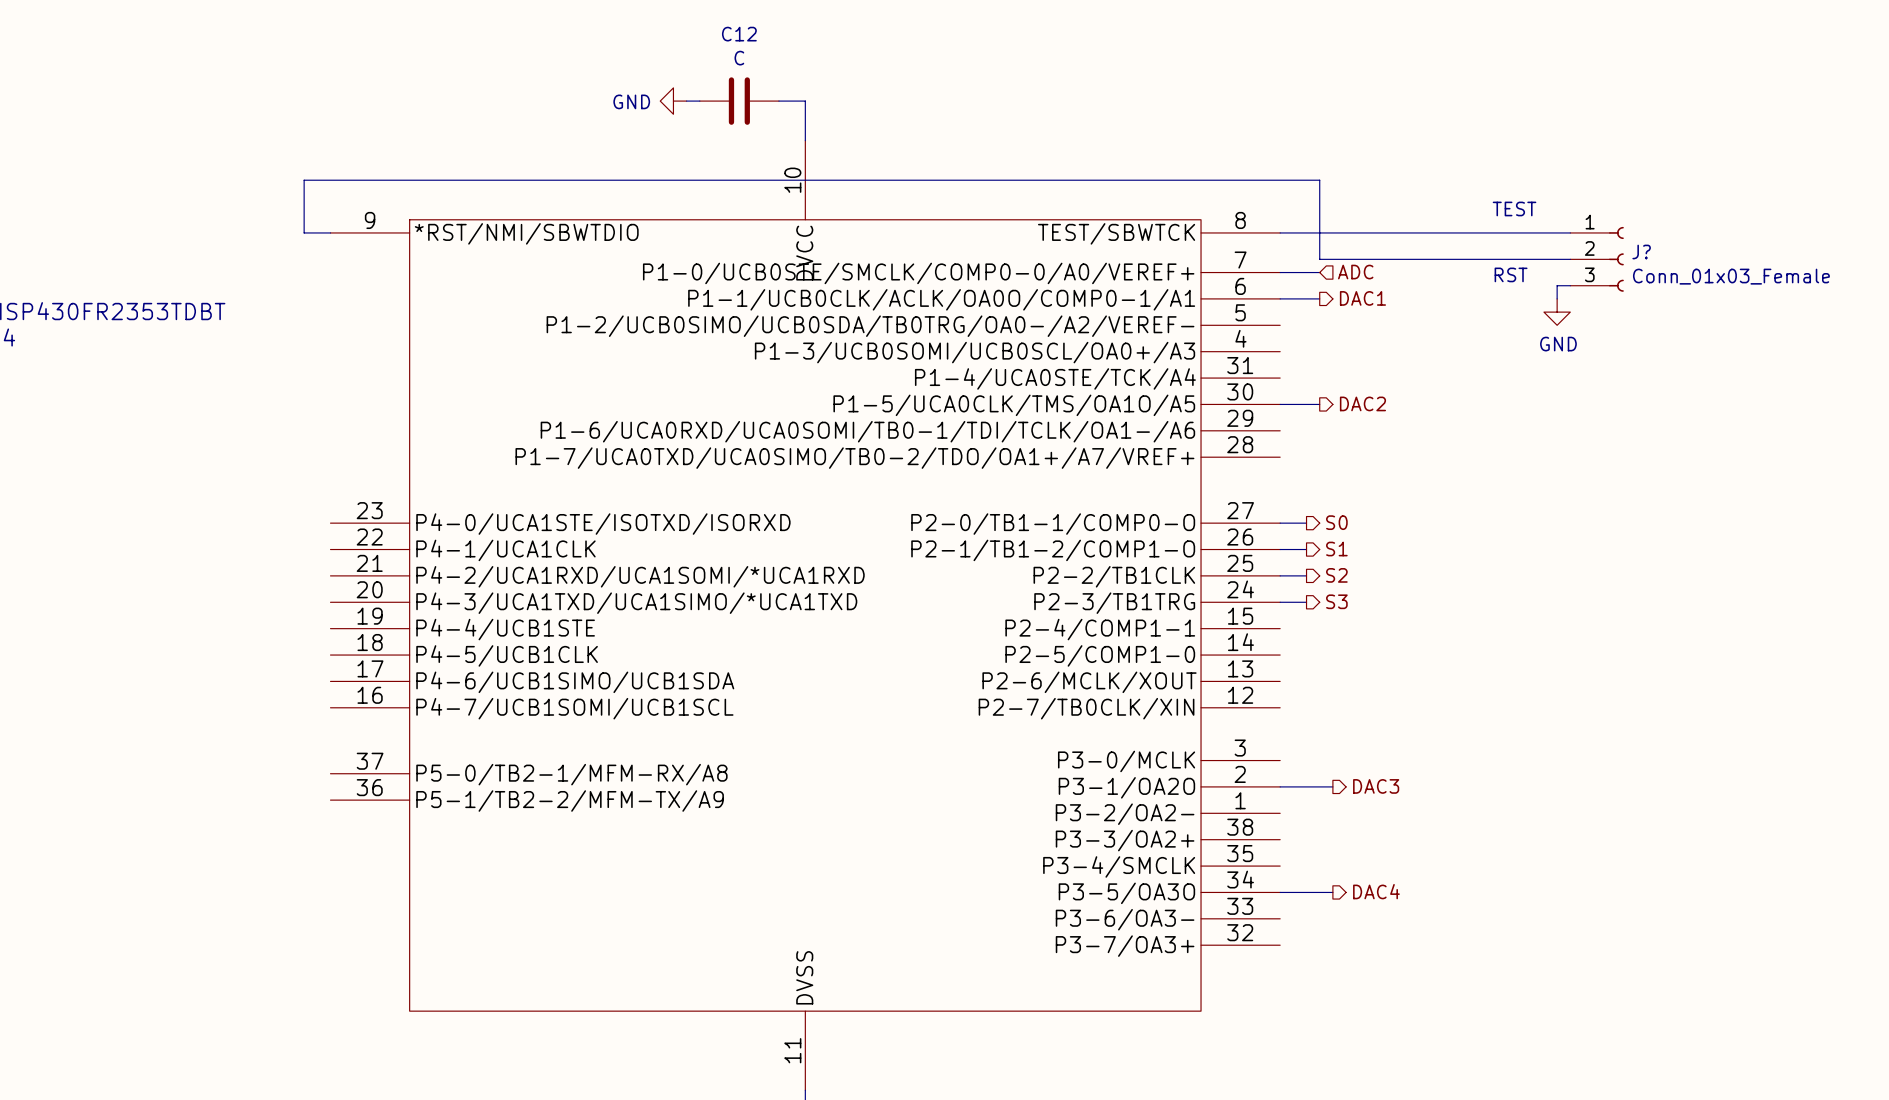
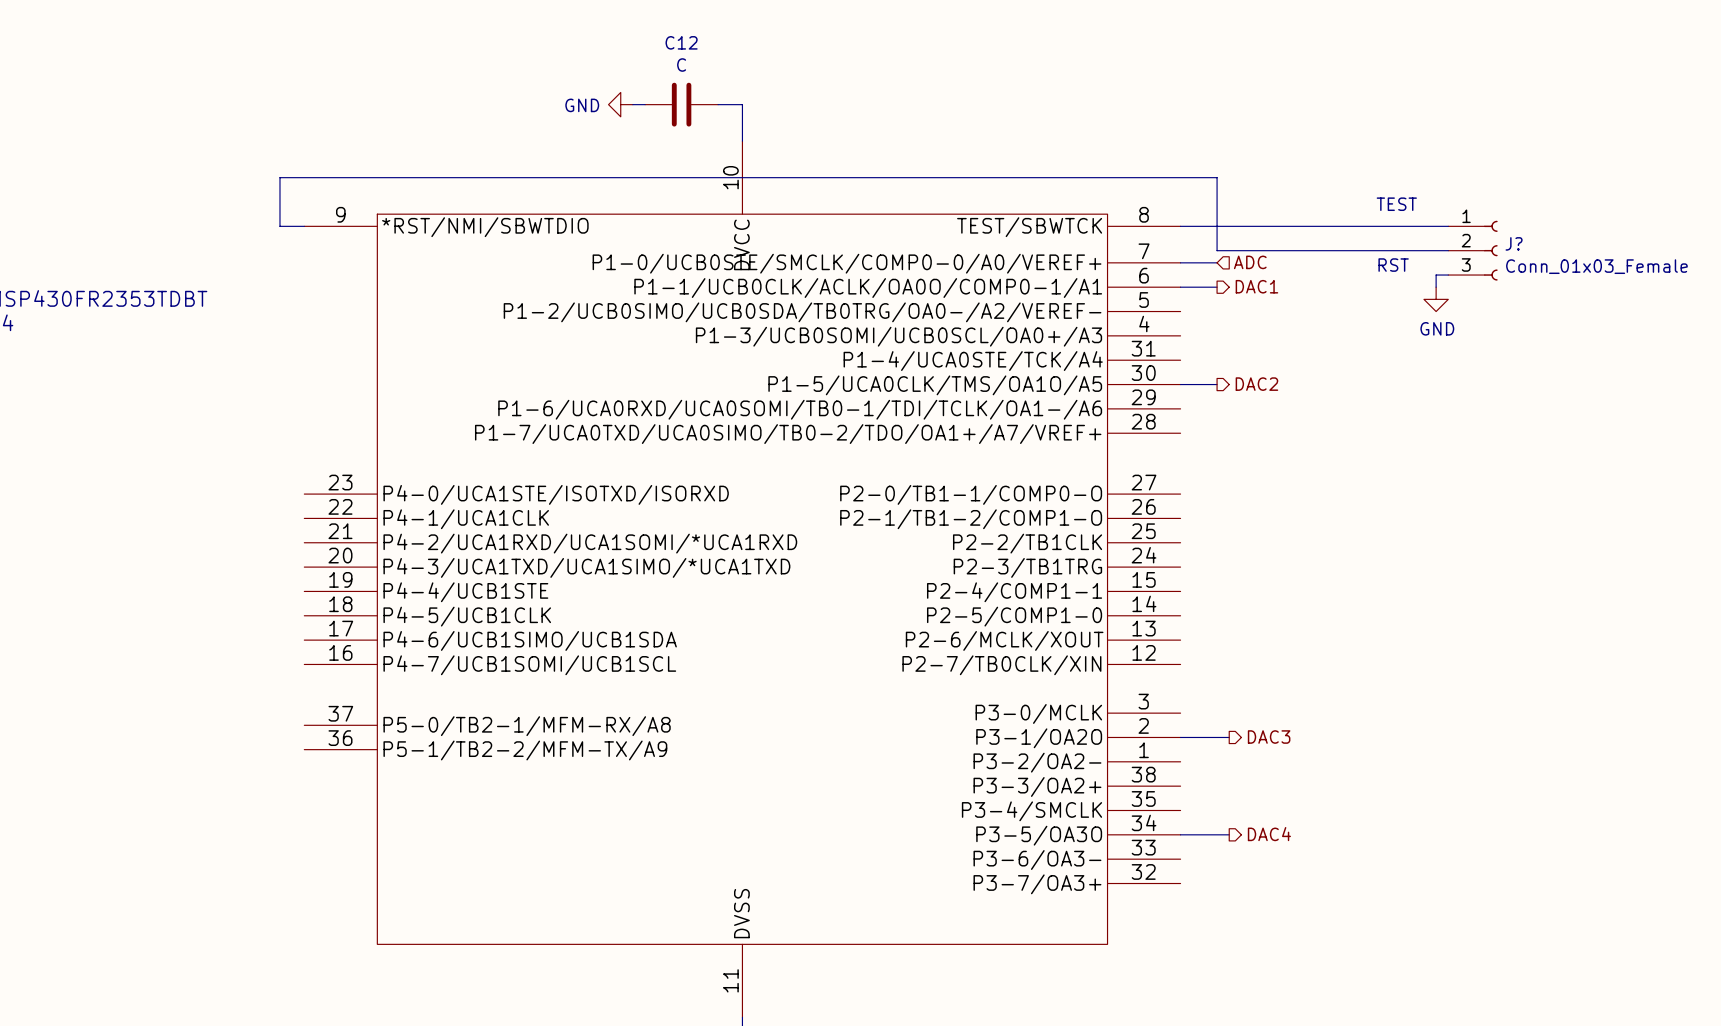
hierarchical label: S0 (1336, 522) -> none
wire: (1280, 523) (1306, 523) -> none
wire: (1280, 549) (1306, 549) -> none
hierarchical label: S1 (1336, 549) -> none
wire: (1280, 575) (1306, 575) -> none
hierarchical label: S2 (1336, 575) -> none
hierarchical label: S3 (1336, 601) -> none
wire: (1280, 602) (1306, 602) -> none

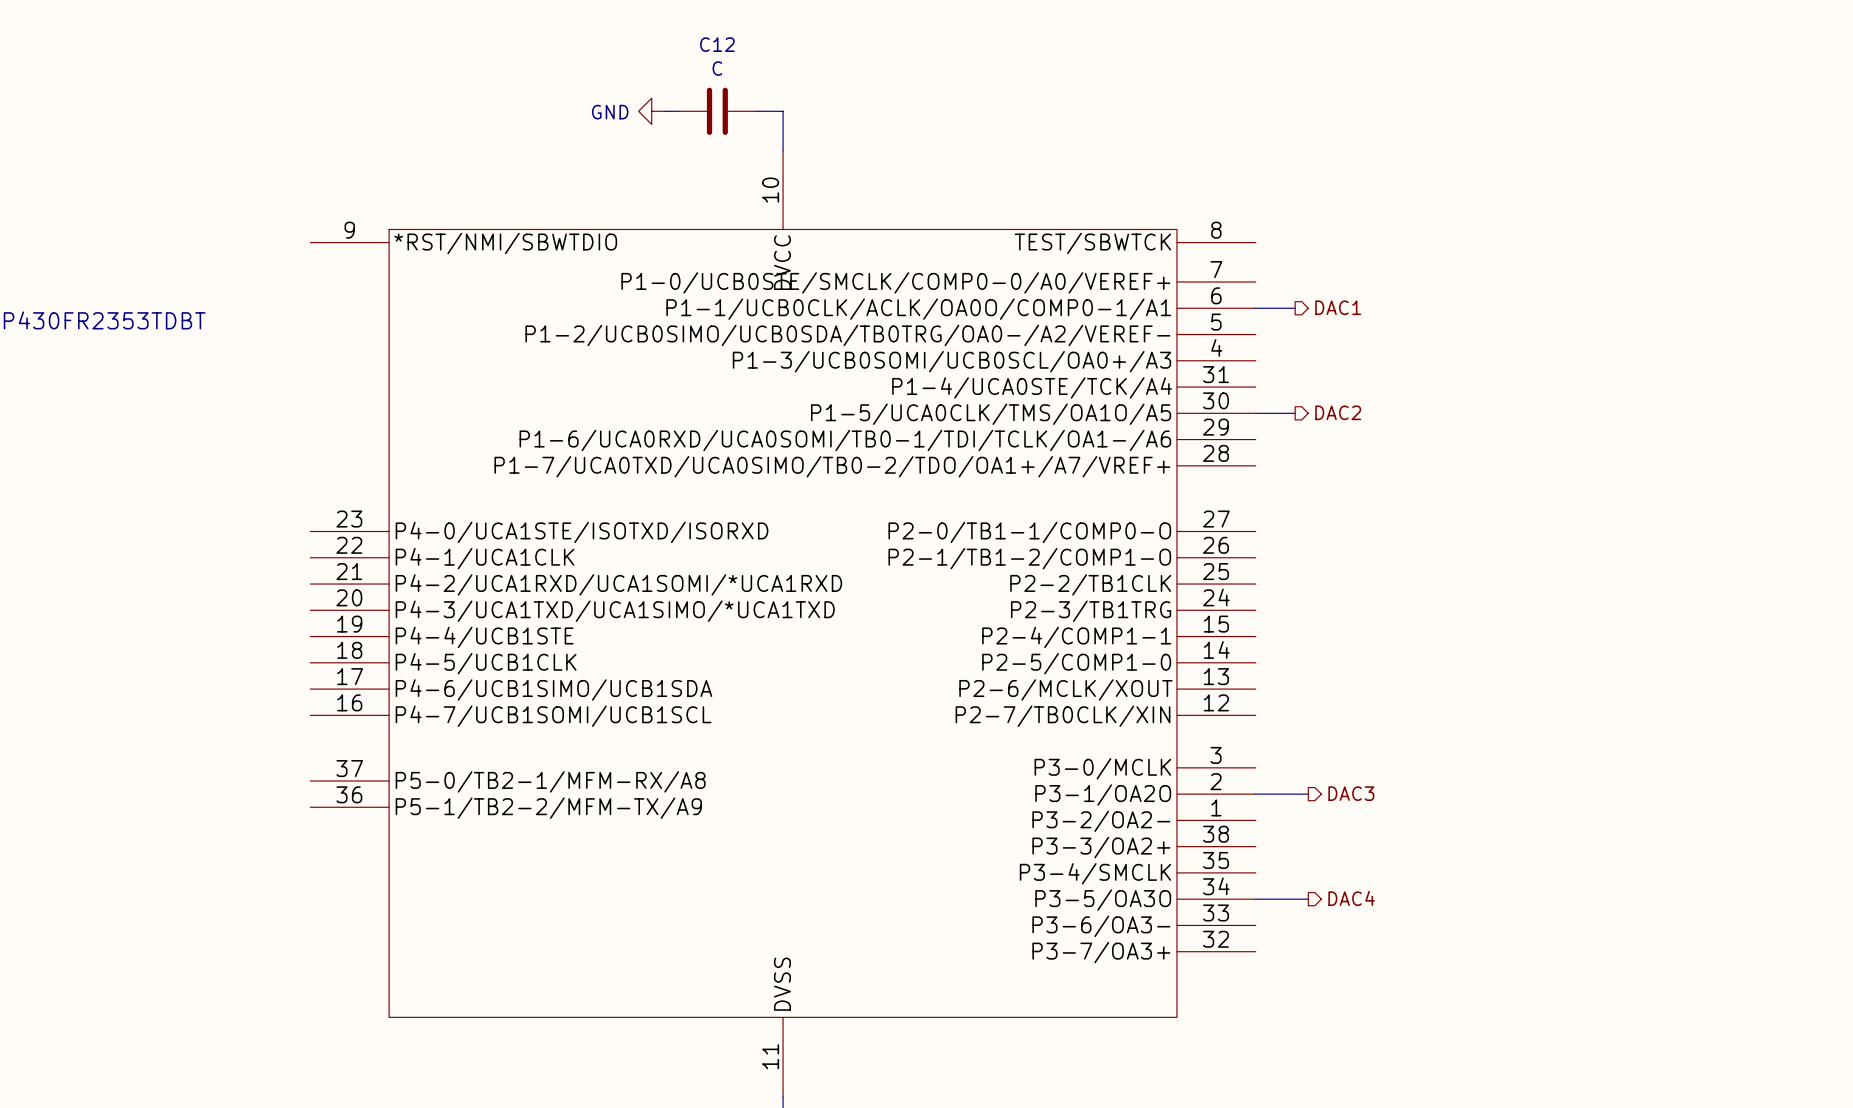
text: TEST (1396, 204) -> none
wire: (304, 226) (279, 226) (279, 177) (1217, 177) (1217, 250) (1448, 250) -> none
wire: (1180, 226) (1448, 226) -> none
J?: Conn_01x03_Female (1472, 250) -> none
wire: (1180, 262) (1217, 262) -> none
hierarchical label: ADC (1250, 262) -> none
text: RST (1393, 265) -> none
wire: (1448, 275) (1436, 275) (1436, 287) -> none
power symbol: GND (1436, 299) -> none

